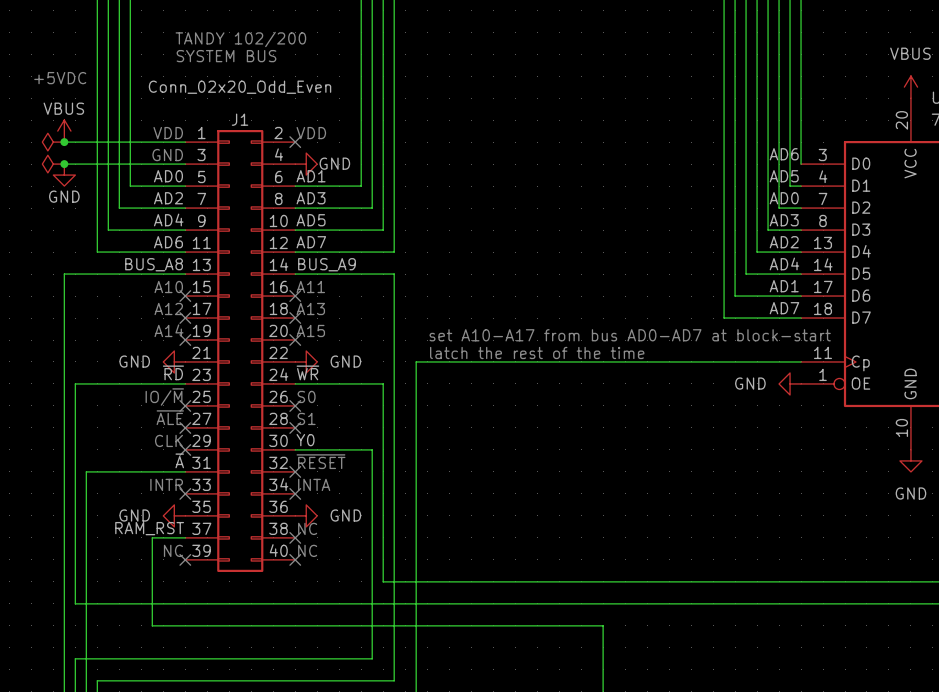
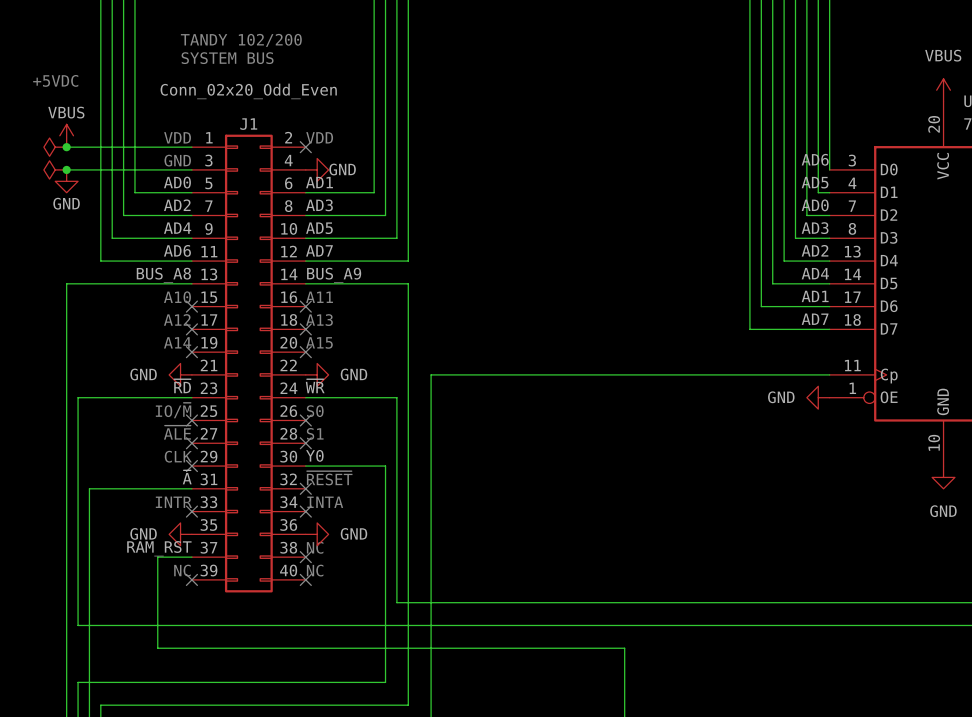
text: set A10-A17 from bus AD0-AD7 at block-start (630, 335) -> none
text: latch the rest of the time (537, 352) -> none

